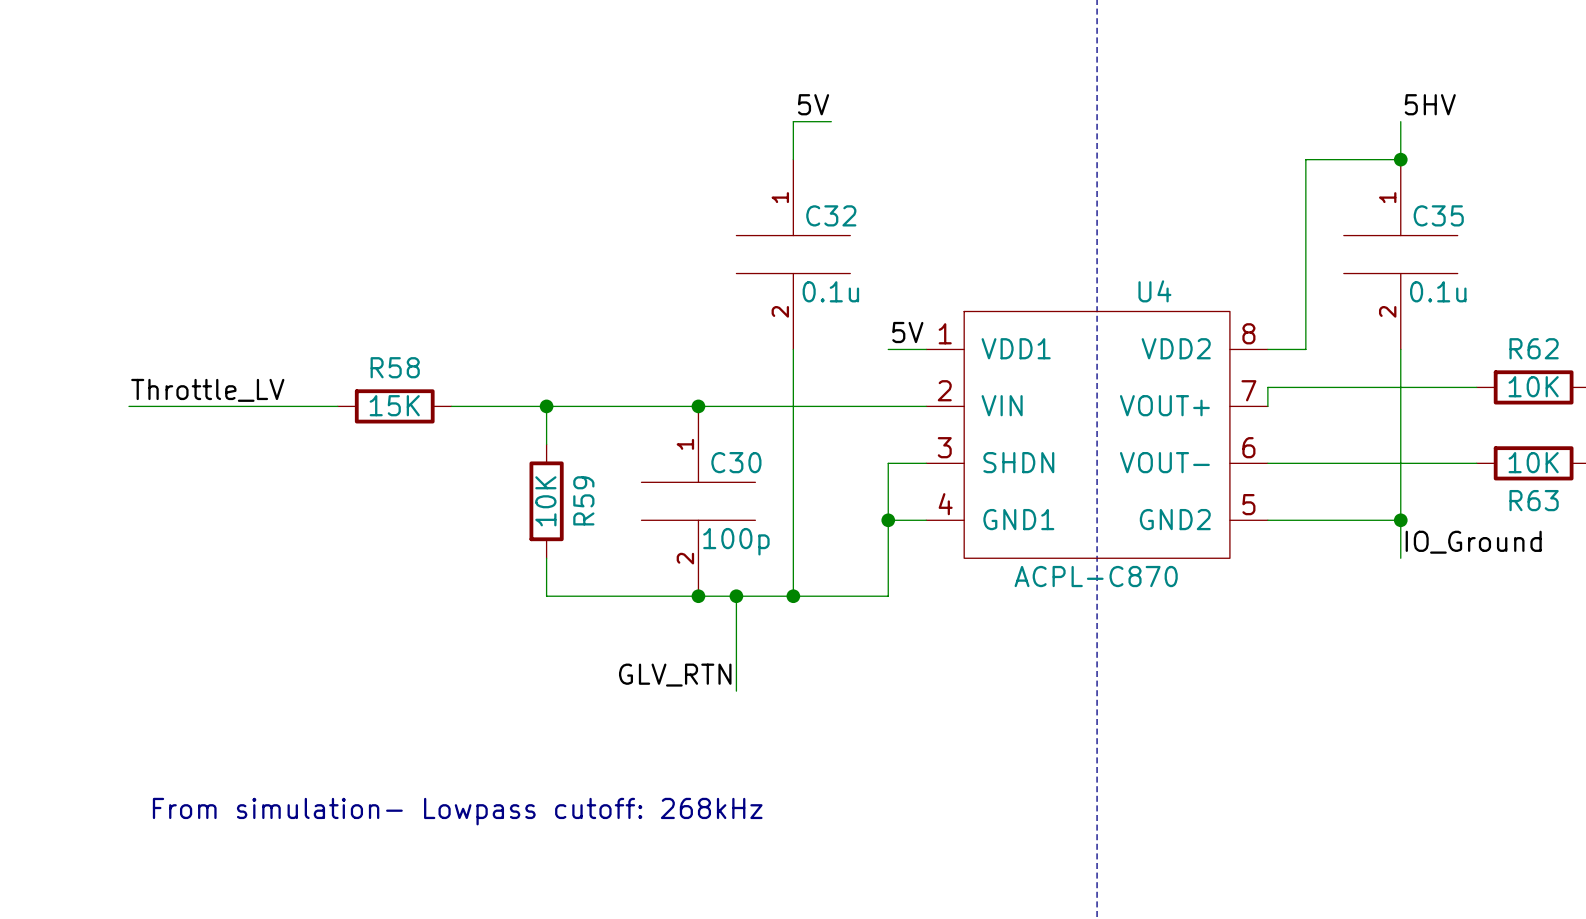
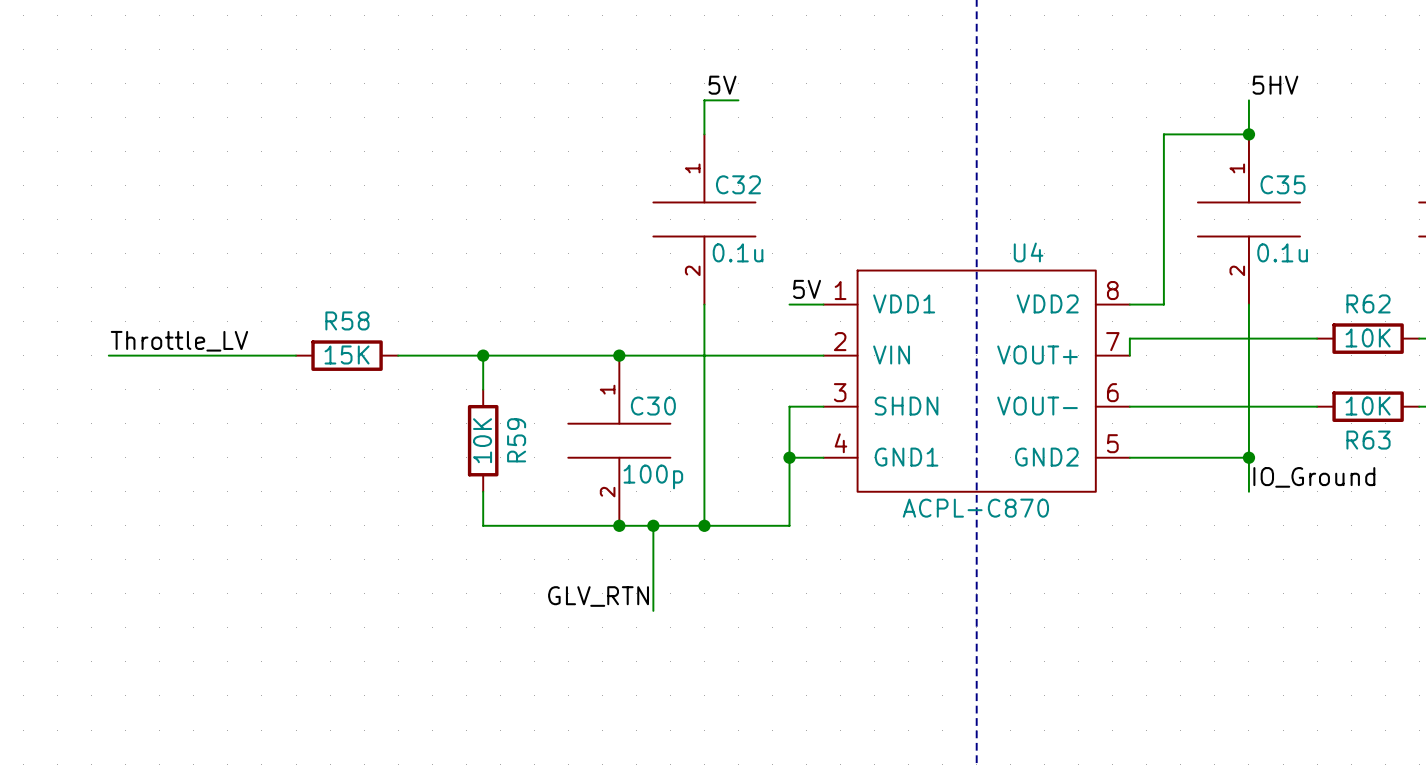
text: From simulation- Lowpass cutoff: 268kHz (457, 811) -> none

